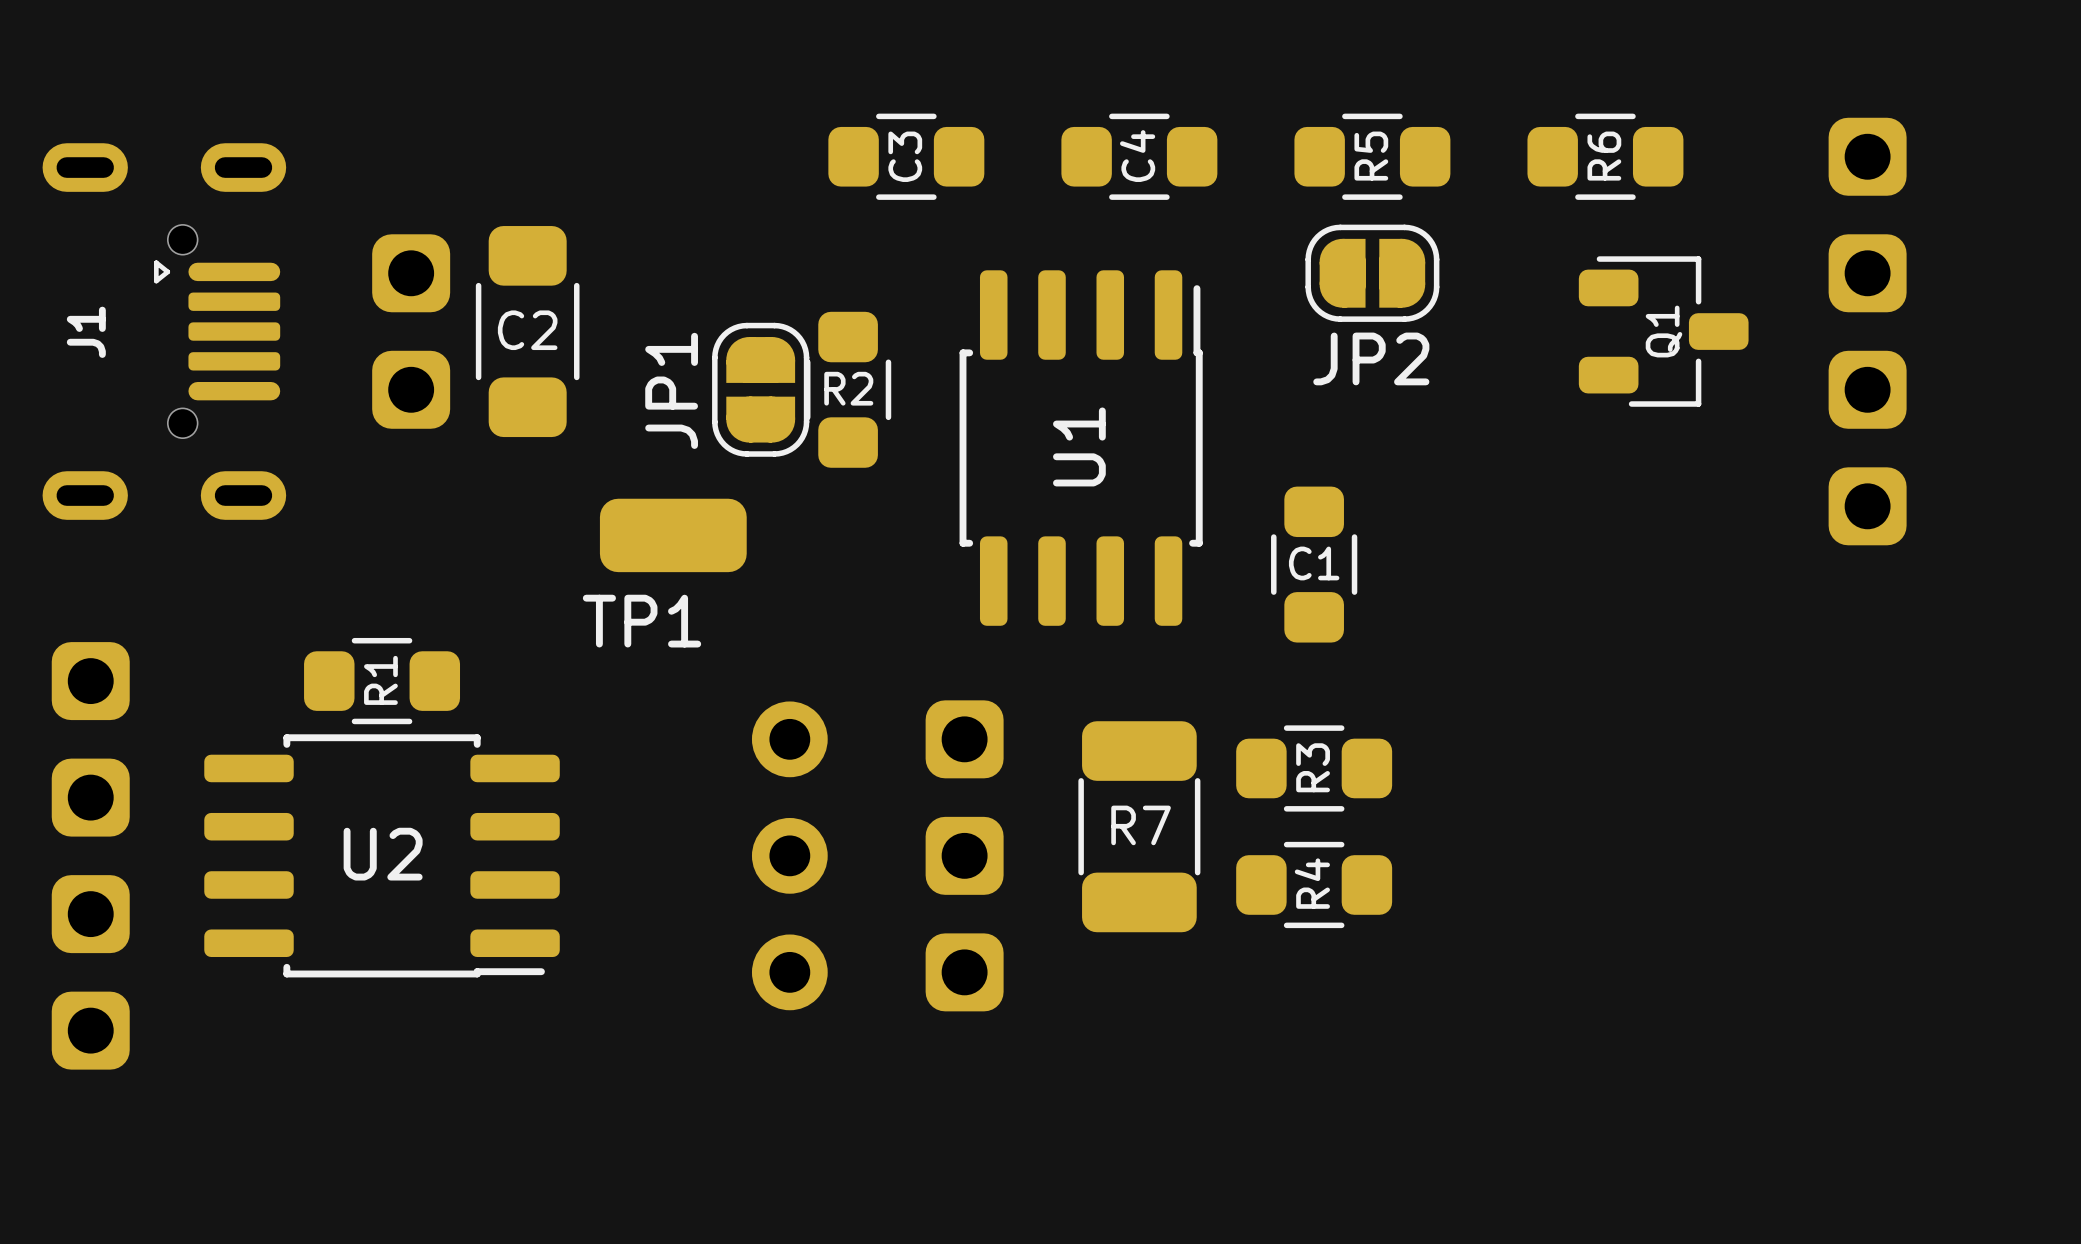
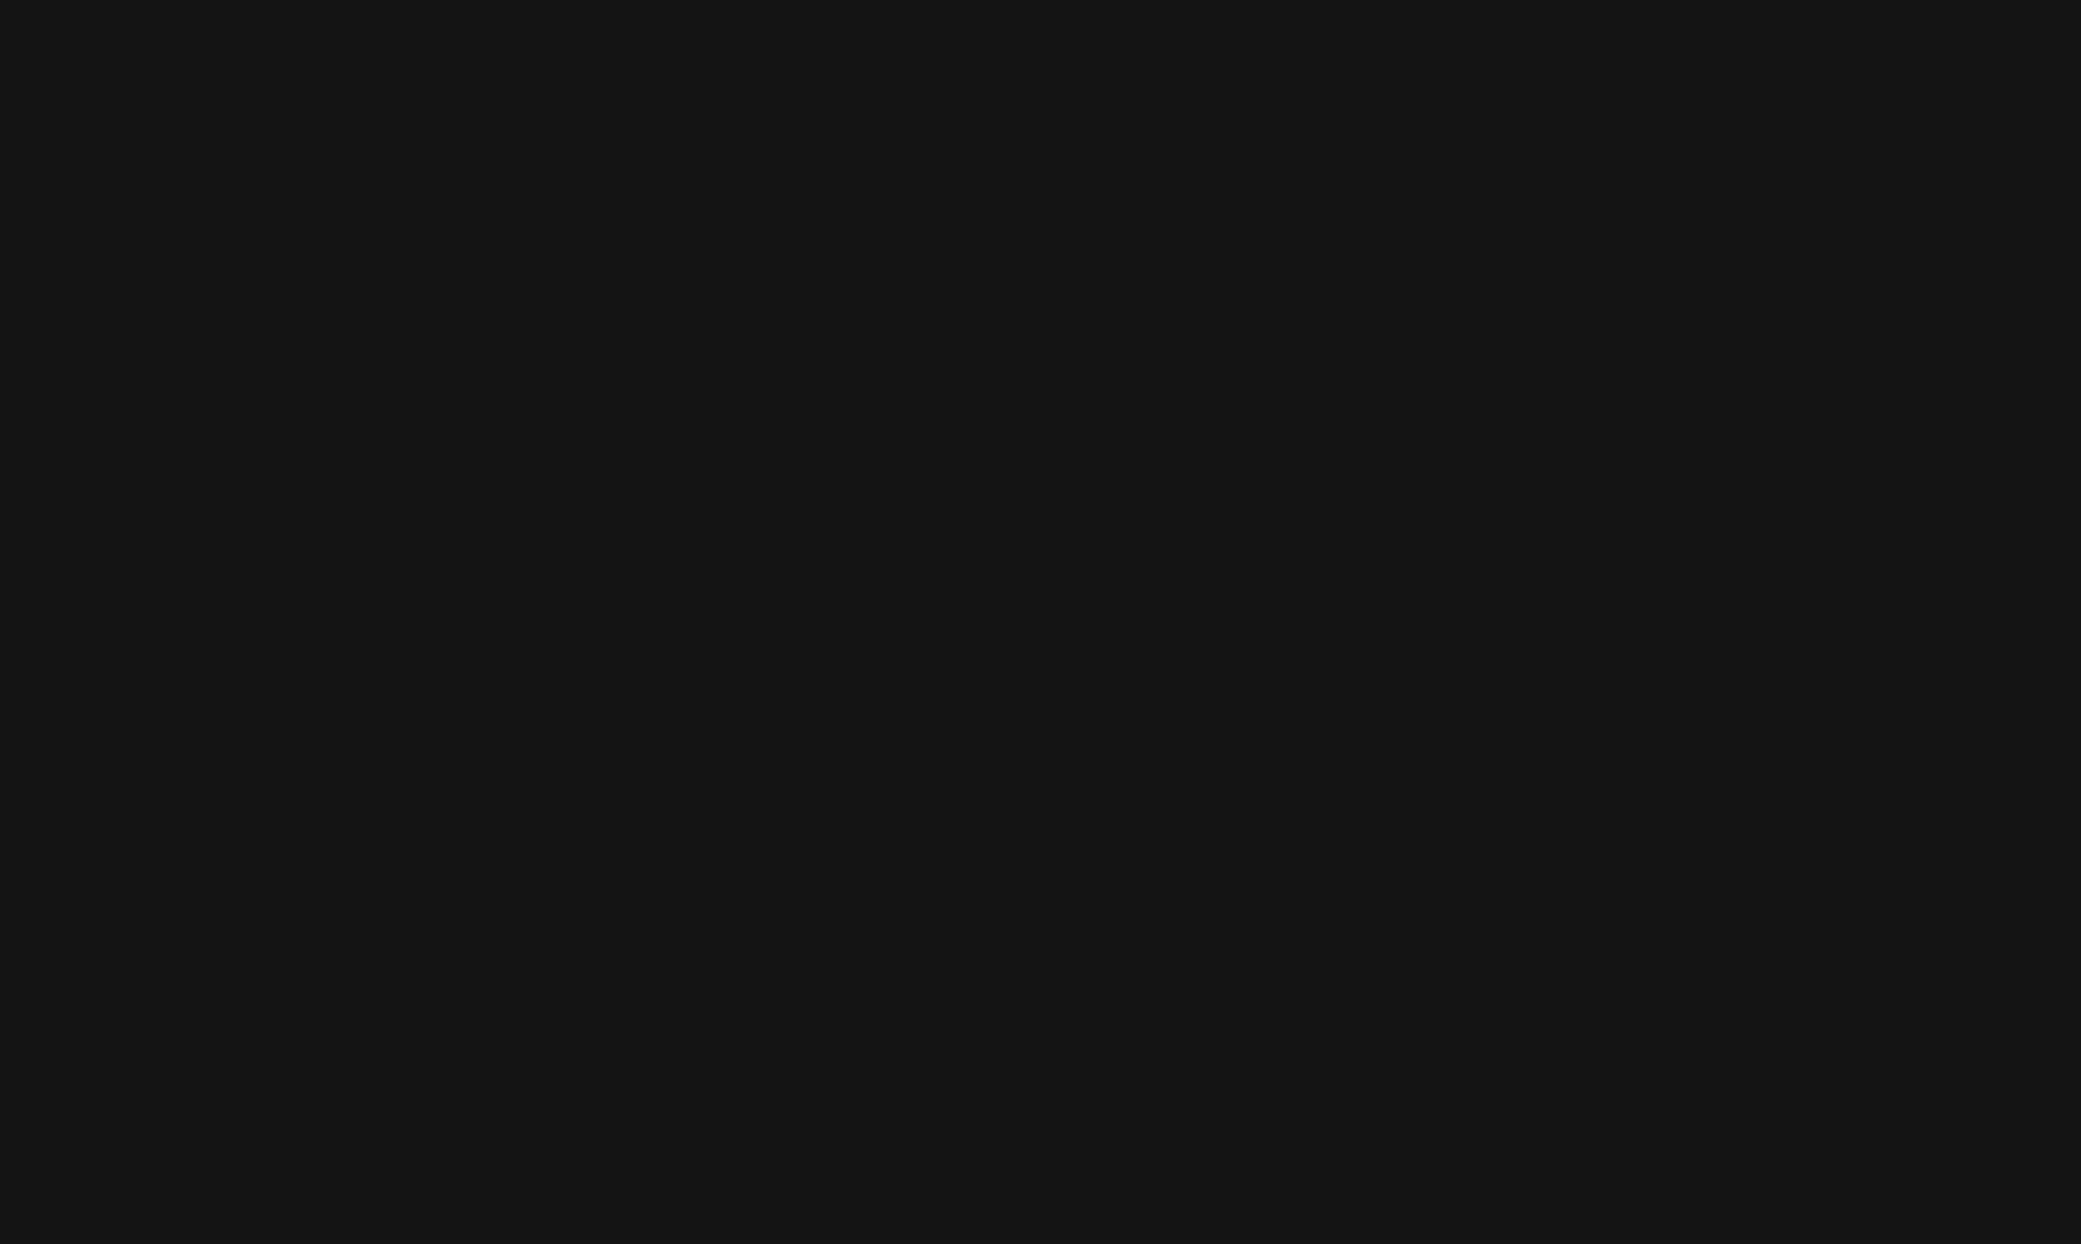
C3: (906, 156) -> none
C4: (1139, 156) -> none
R5: (1372, 156) -> none
R6: (1605, 156) -> none
part: (1867, 215) -> none
JP2: (1372, 273) -> none
J1: (164, 331) -> none
part: (411, 331) -> none
C2: (527, 331) -> none
Q1: (1663, 331) -> none
JP1: (760, 389) -> none
R2: (848, 389) -> none
U1: (1081, 448) -> none
part: (1867, 448) -> none
TP1: (673, 535) -> none
C1: (1314, 564) -> none
R1: (382, 681) -> none
R3: (1314, 768) -> none
R7: (1139, 826) -> none
part: (90, 855) -> none
U2: (382, 855) -> none
part: (789, 855) -> none
part: (964, 855) -> none
R4: (1314, 884) -> none

